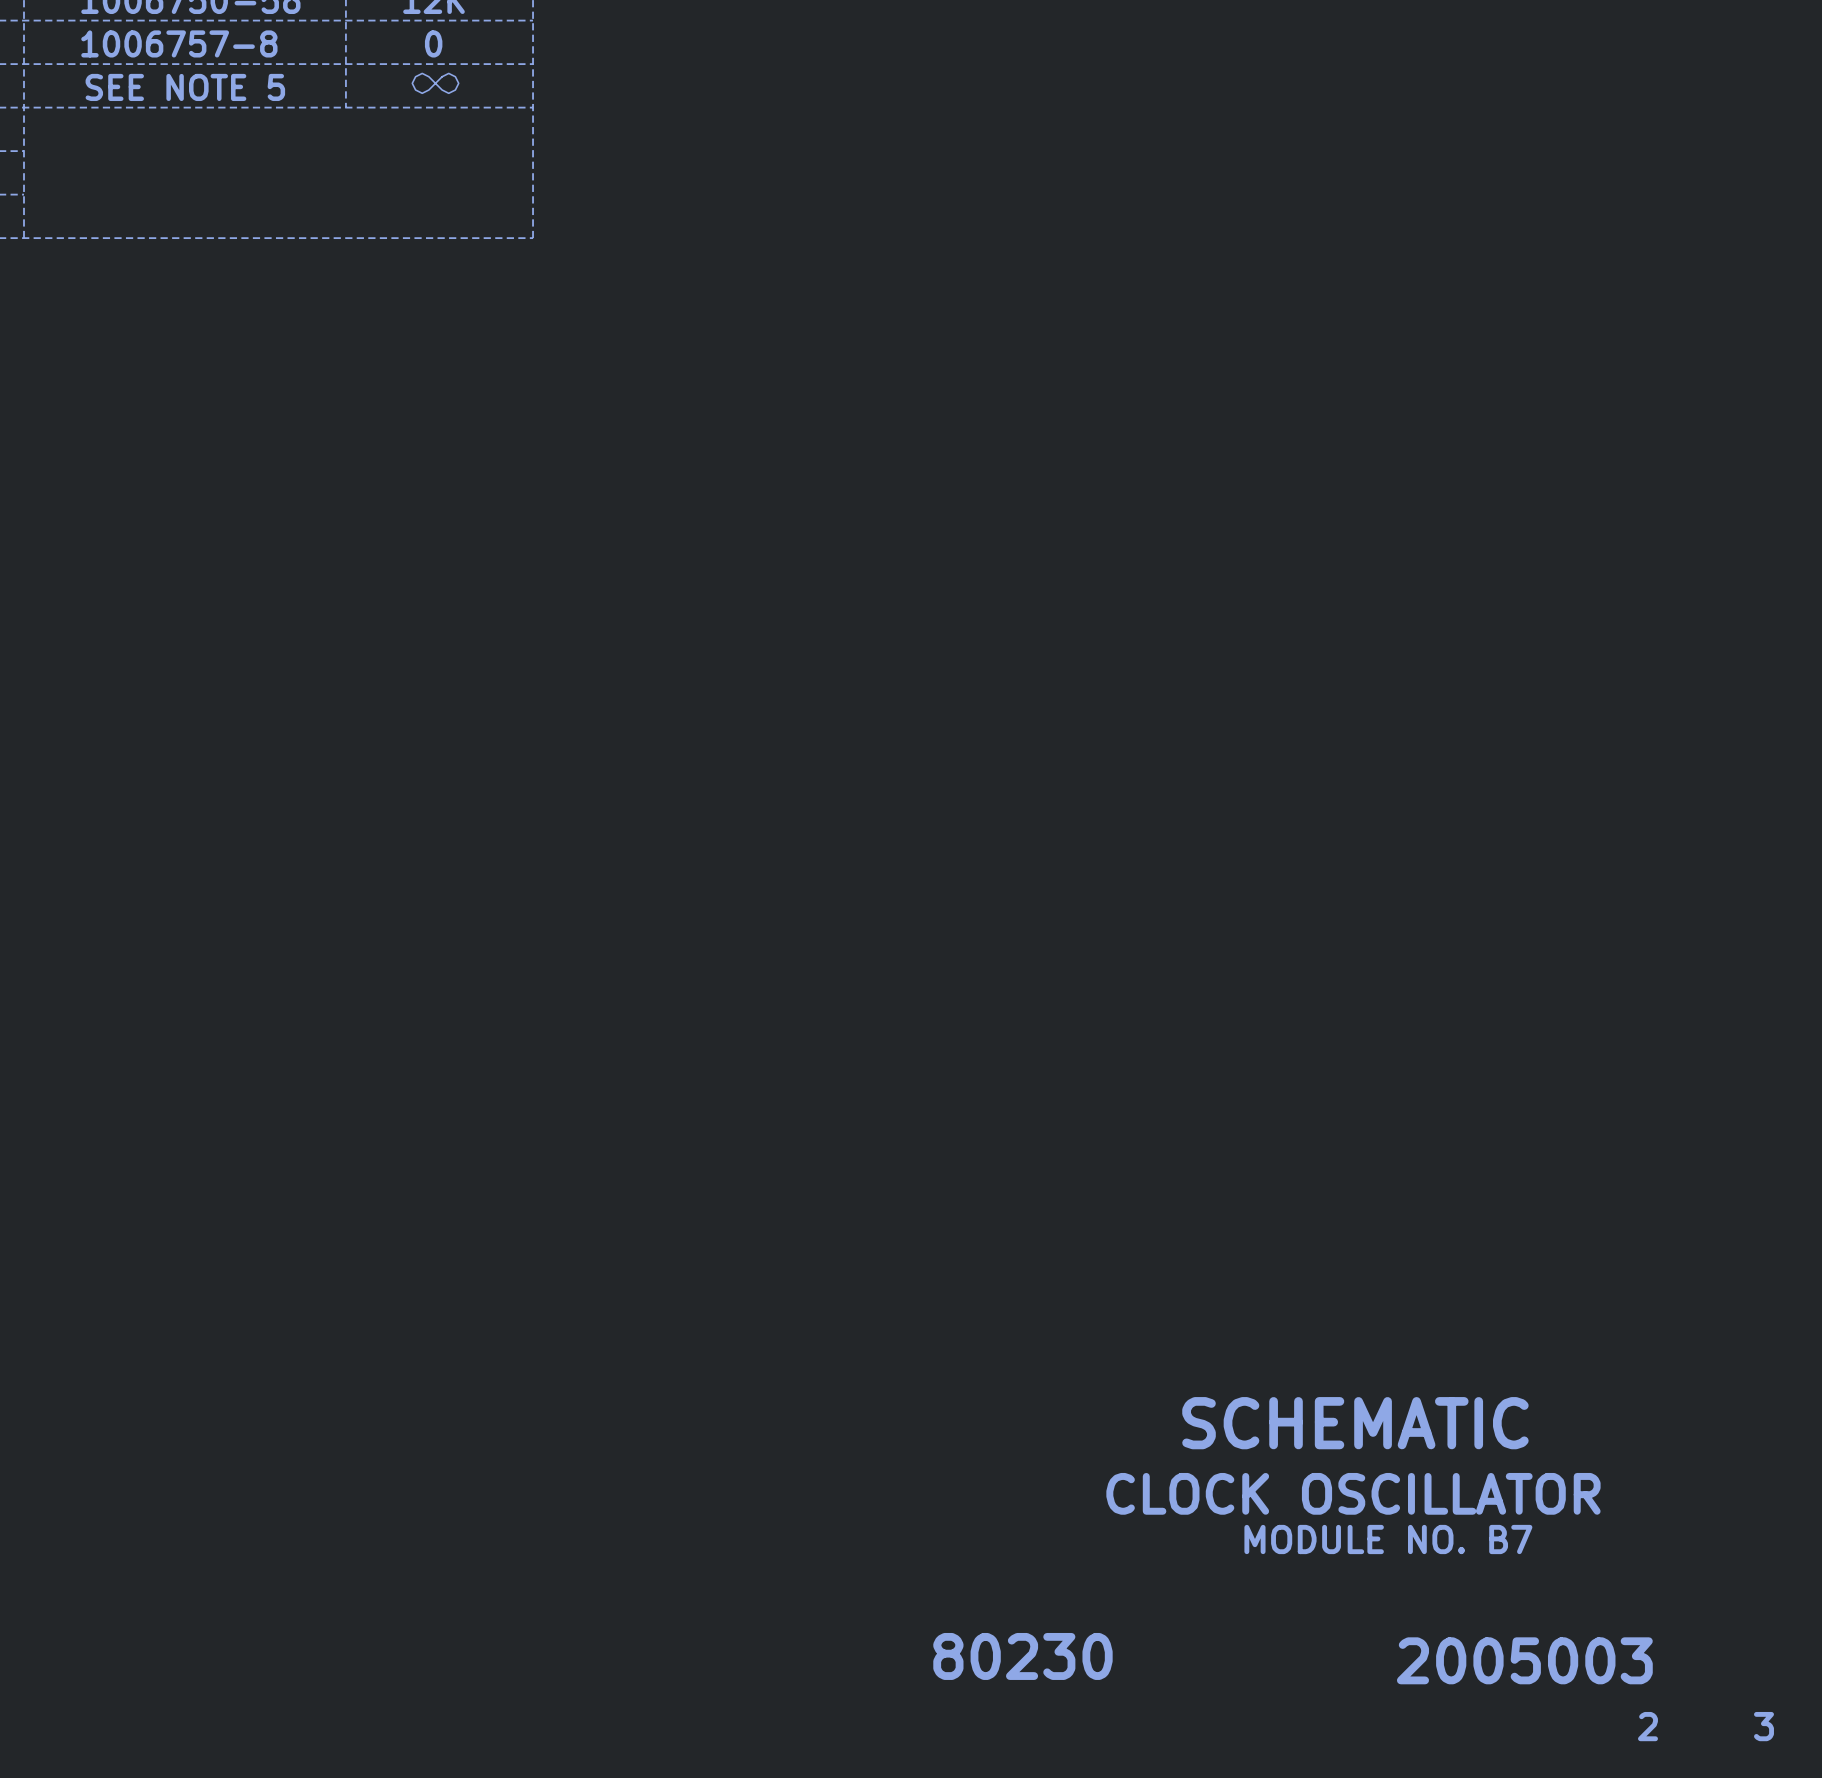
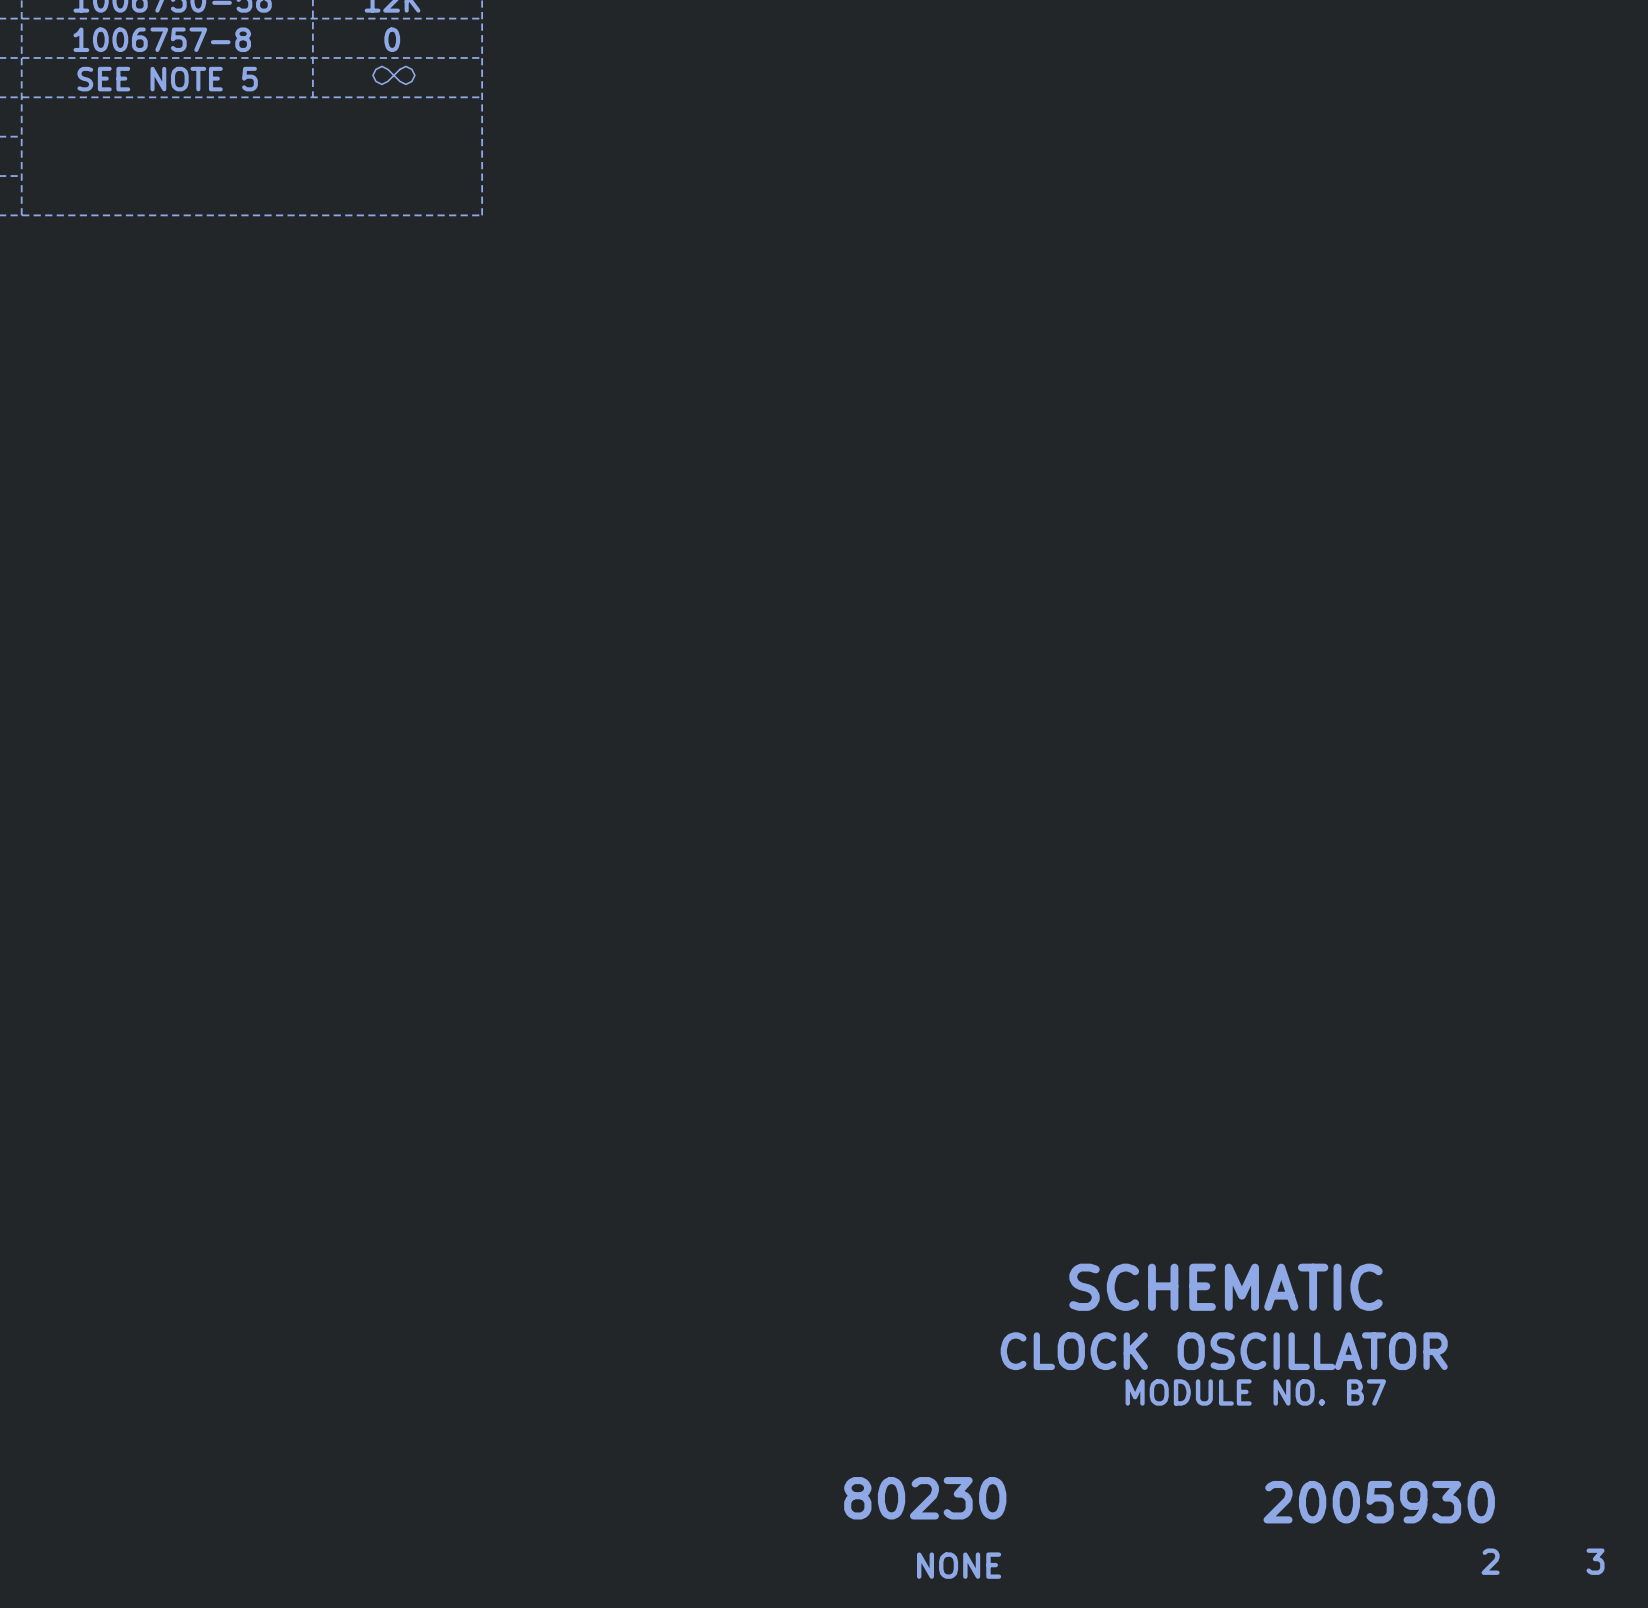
text: 2005003 (1524, 1660) -> 2005930 (1379, 1502)
text: none -> NONE (959, 1565)

